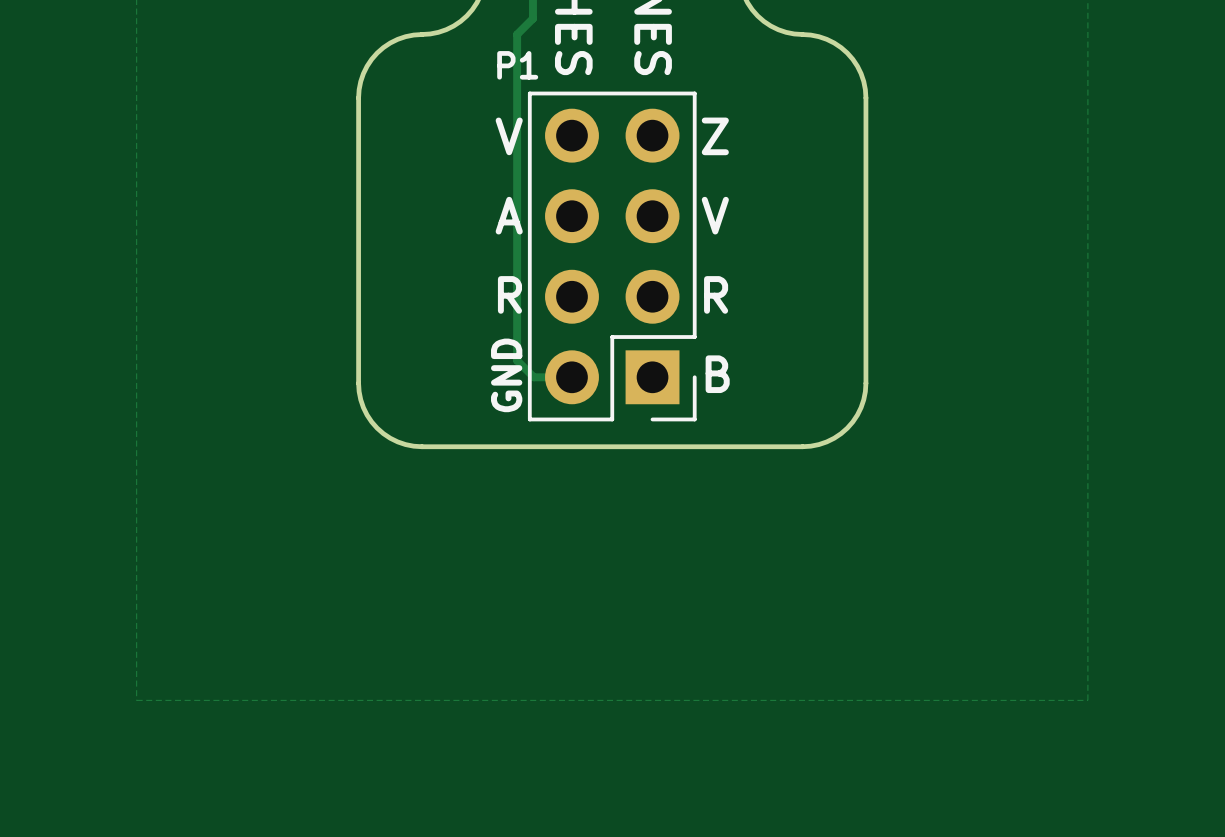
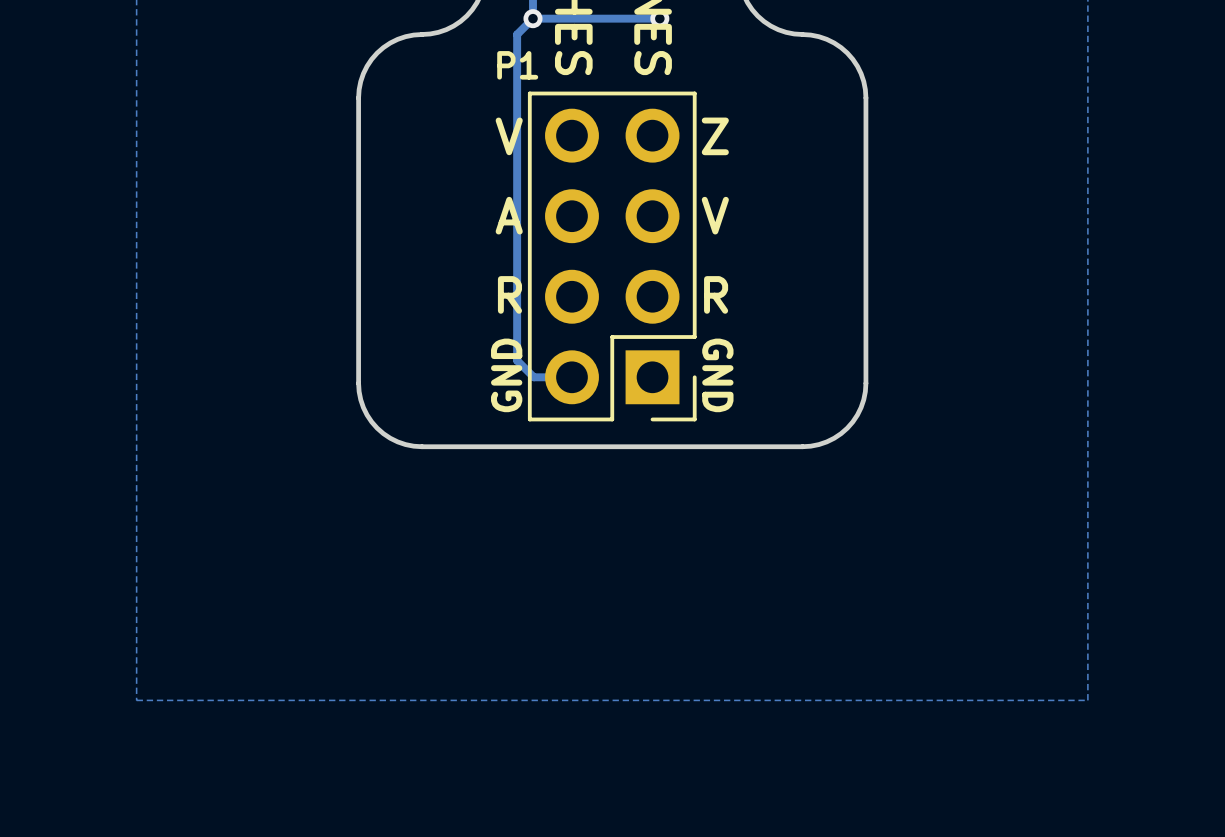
via: none -> (532, 18)
track: none -> (659, 18) (532, 18)
via: none -> (659, 18)
text: B (717, 374) -> GND (717, 375)

